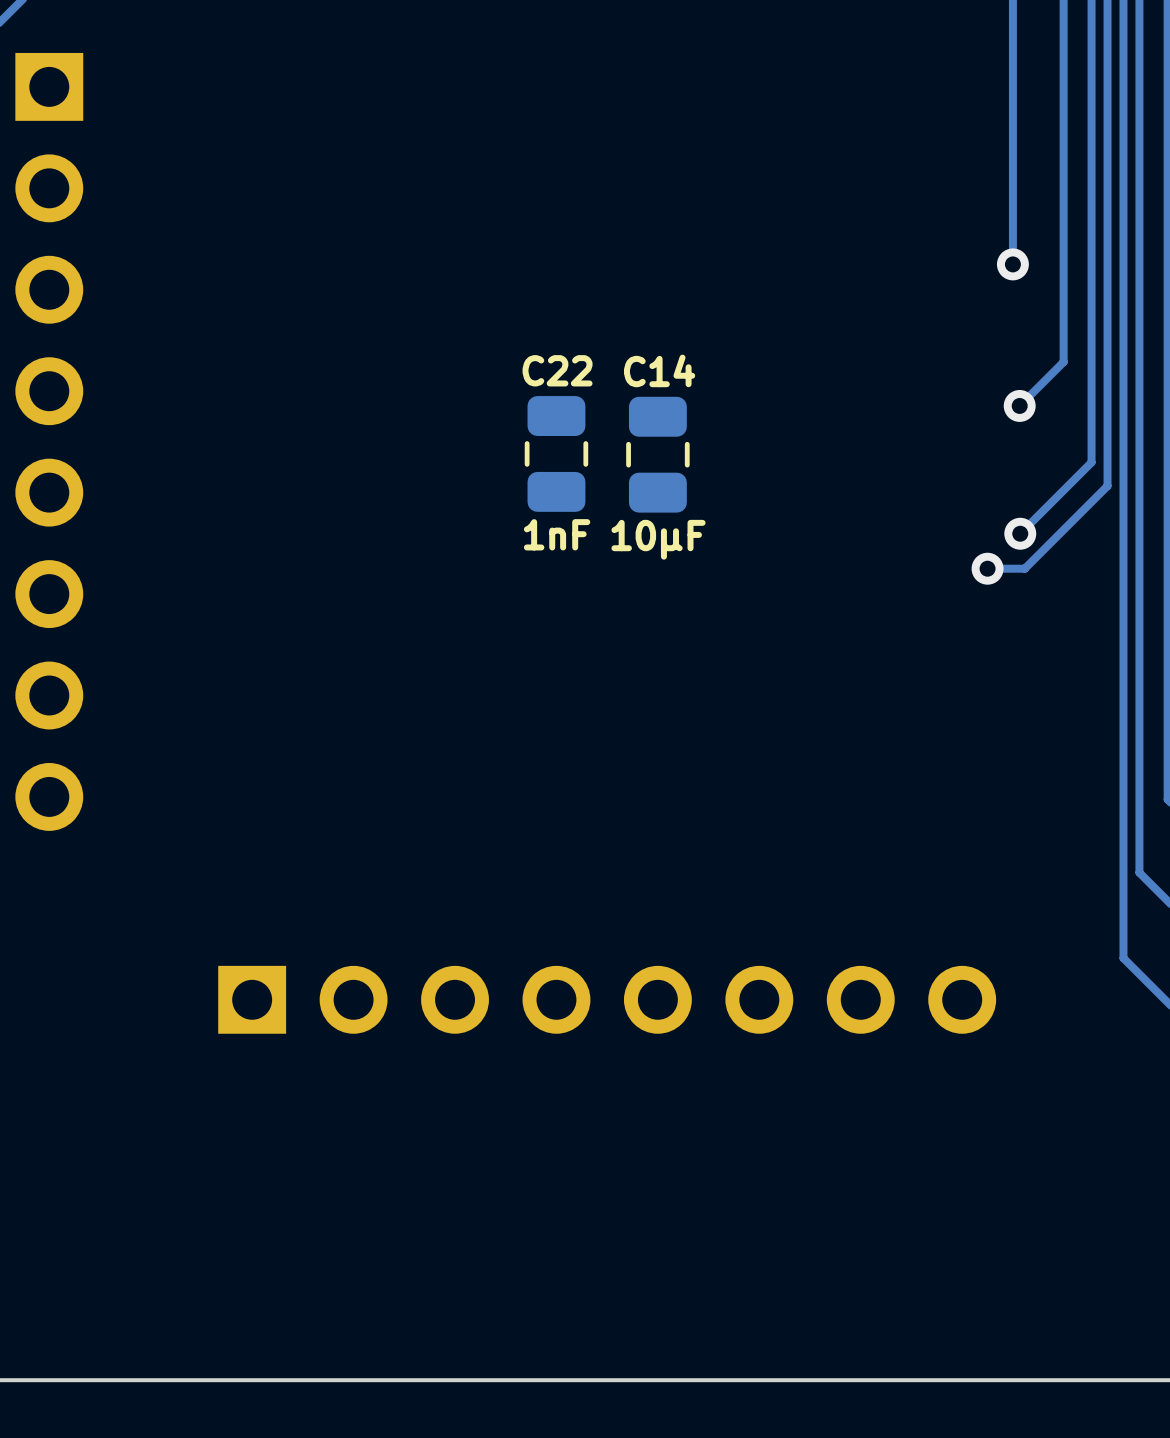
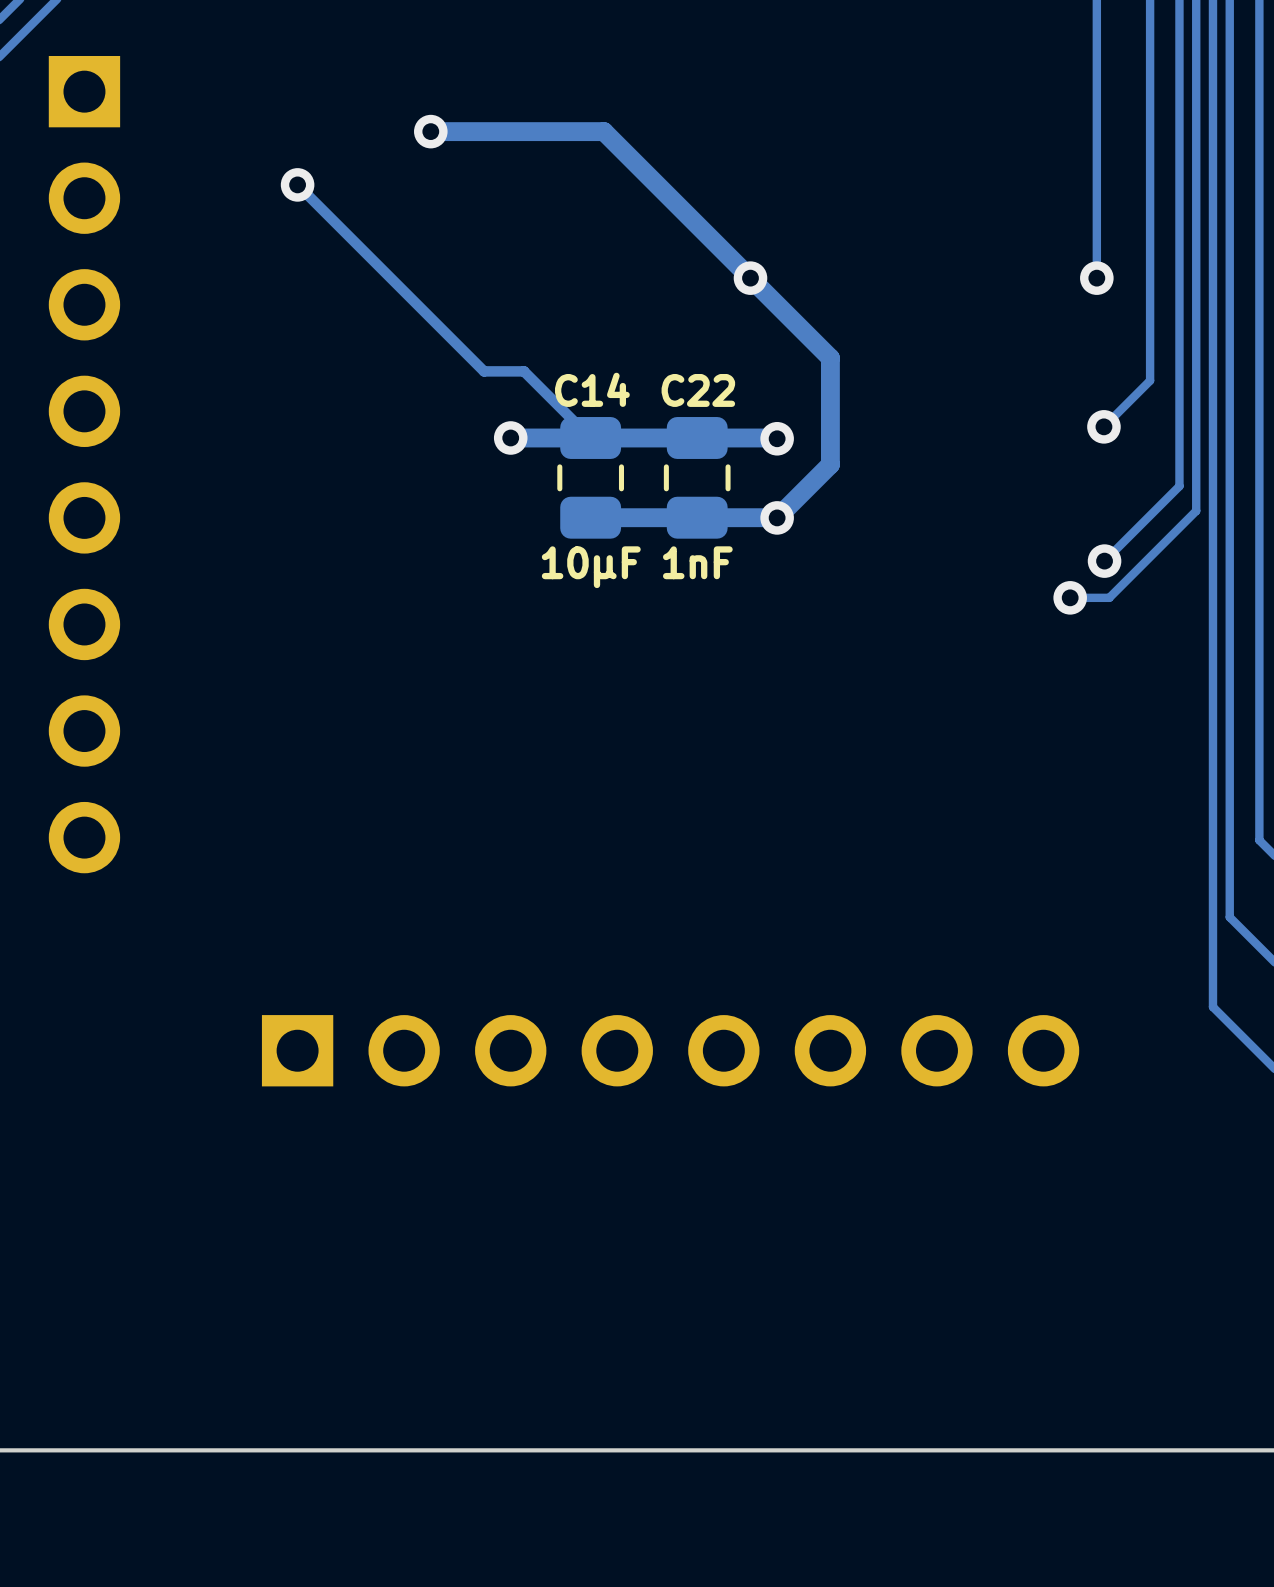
track: none -> (430, 131) (603, 131) (830, 358) (830, 464) (777, 517)
via: none -> (430, 131)
track: none -> (297, 184) (484, 371) (524, 371) (590, 437)
via: none -> (297, 184)
via: none -> (750, 278)
track: none -> (510, 437) (777, 438)
via: none -> (510, 437)
via: none -> (777, 438)
C22 position: (556, 453) -> (697, 477)
C14 position: (657, 454) -> (590, 477)
track: none -> (776, 517) (590, 517)
via: none -> (777, 517)

